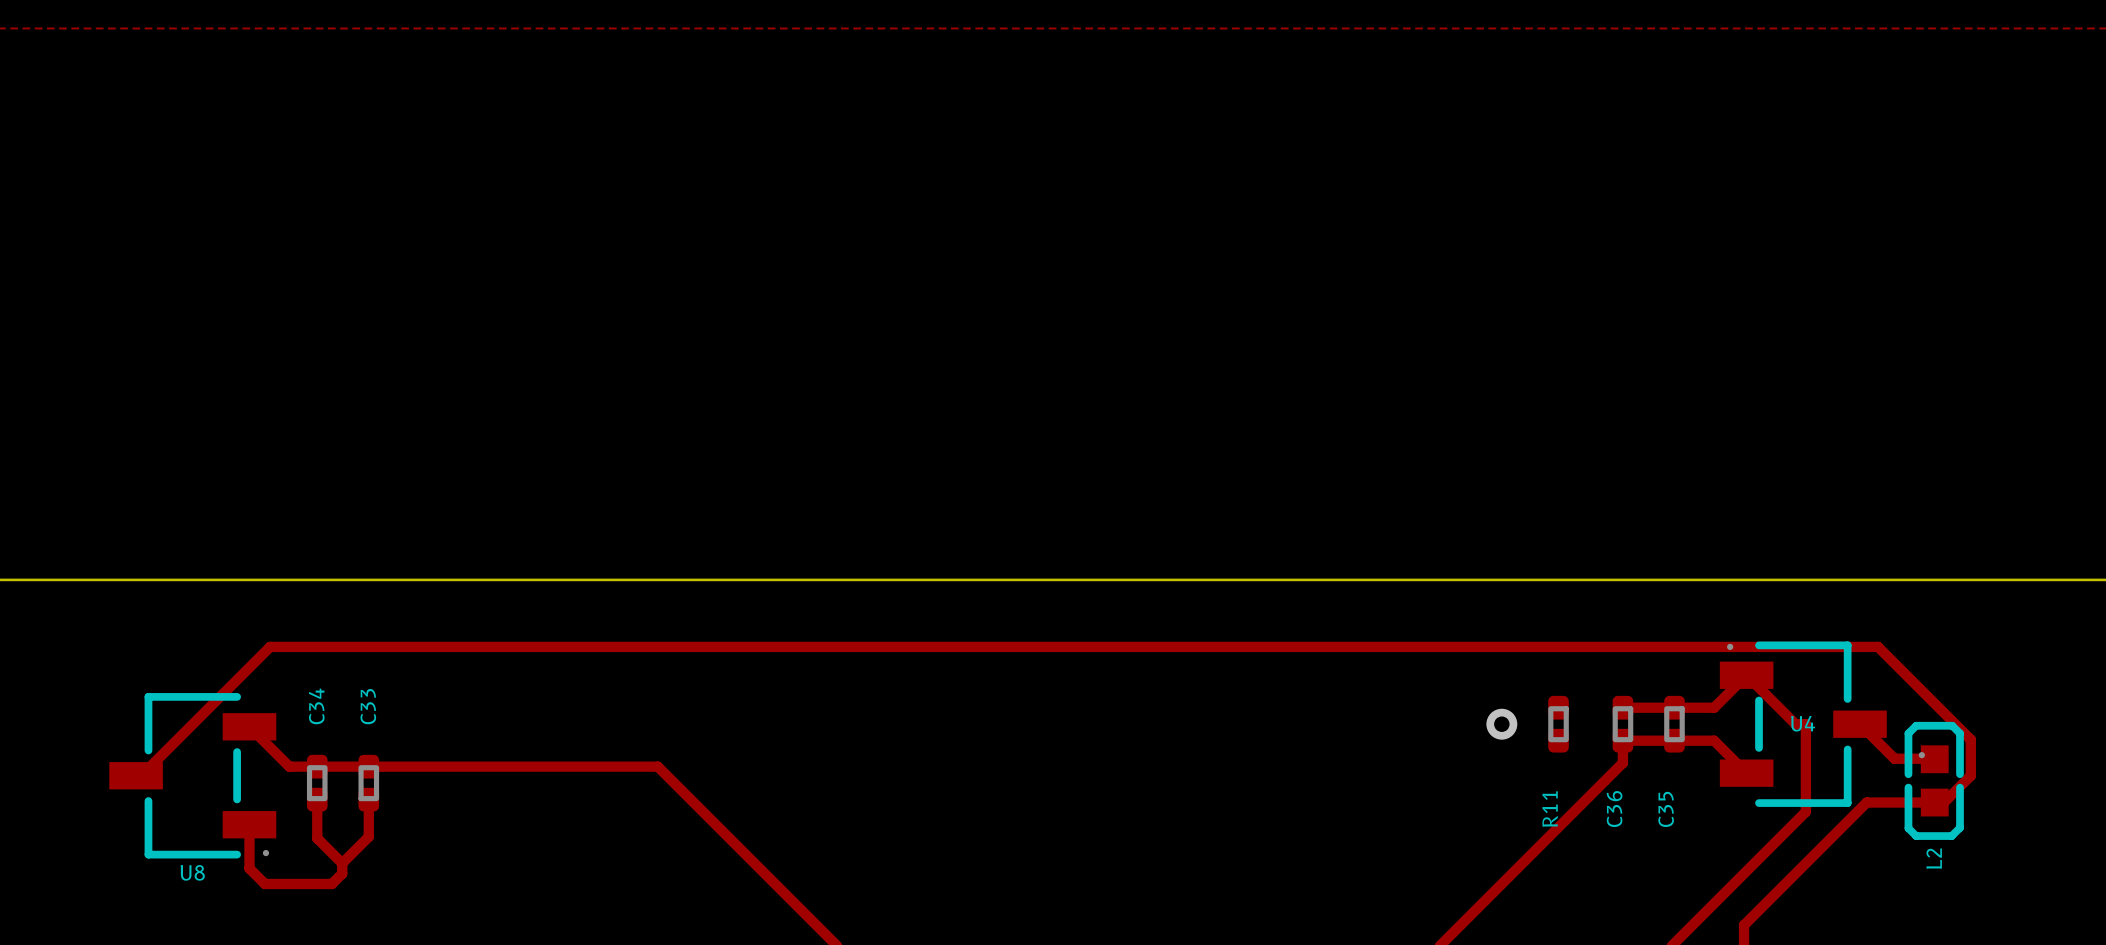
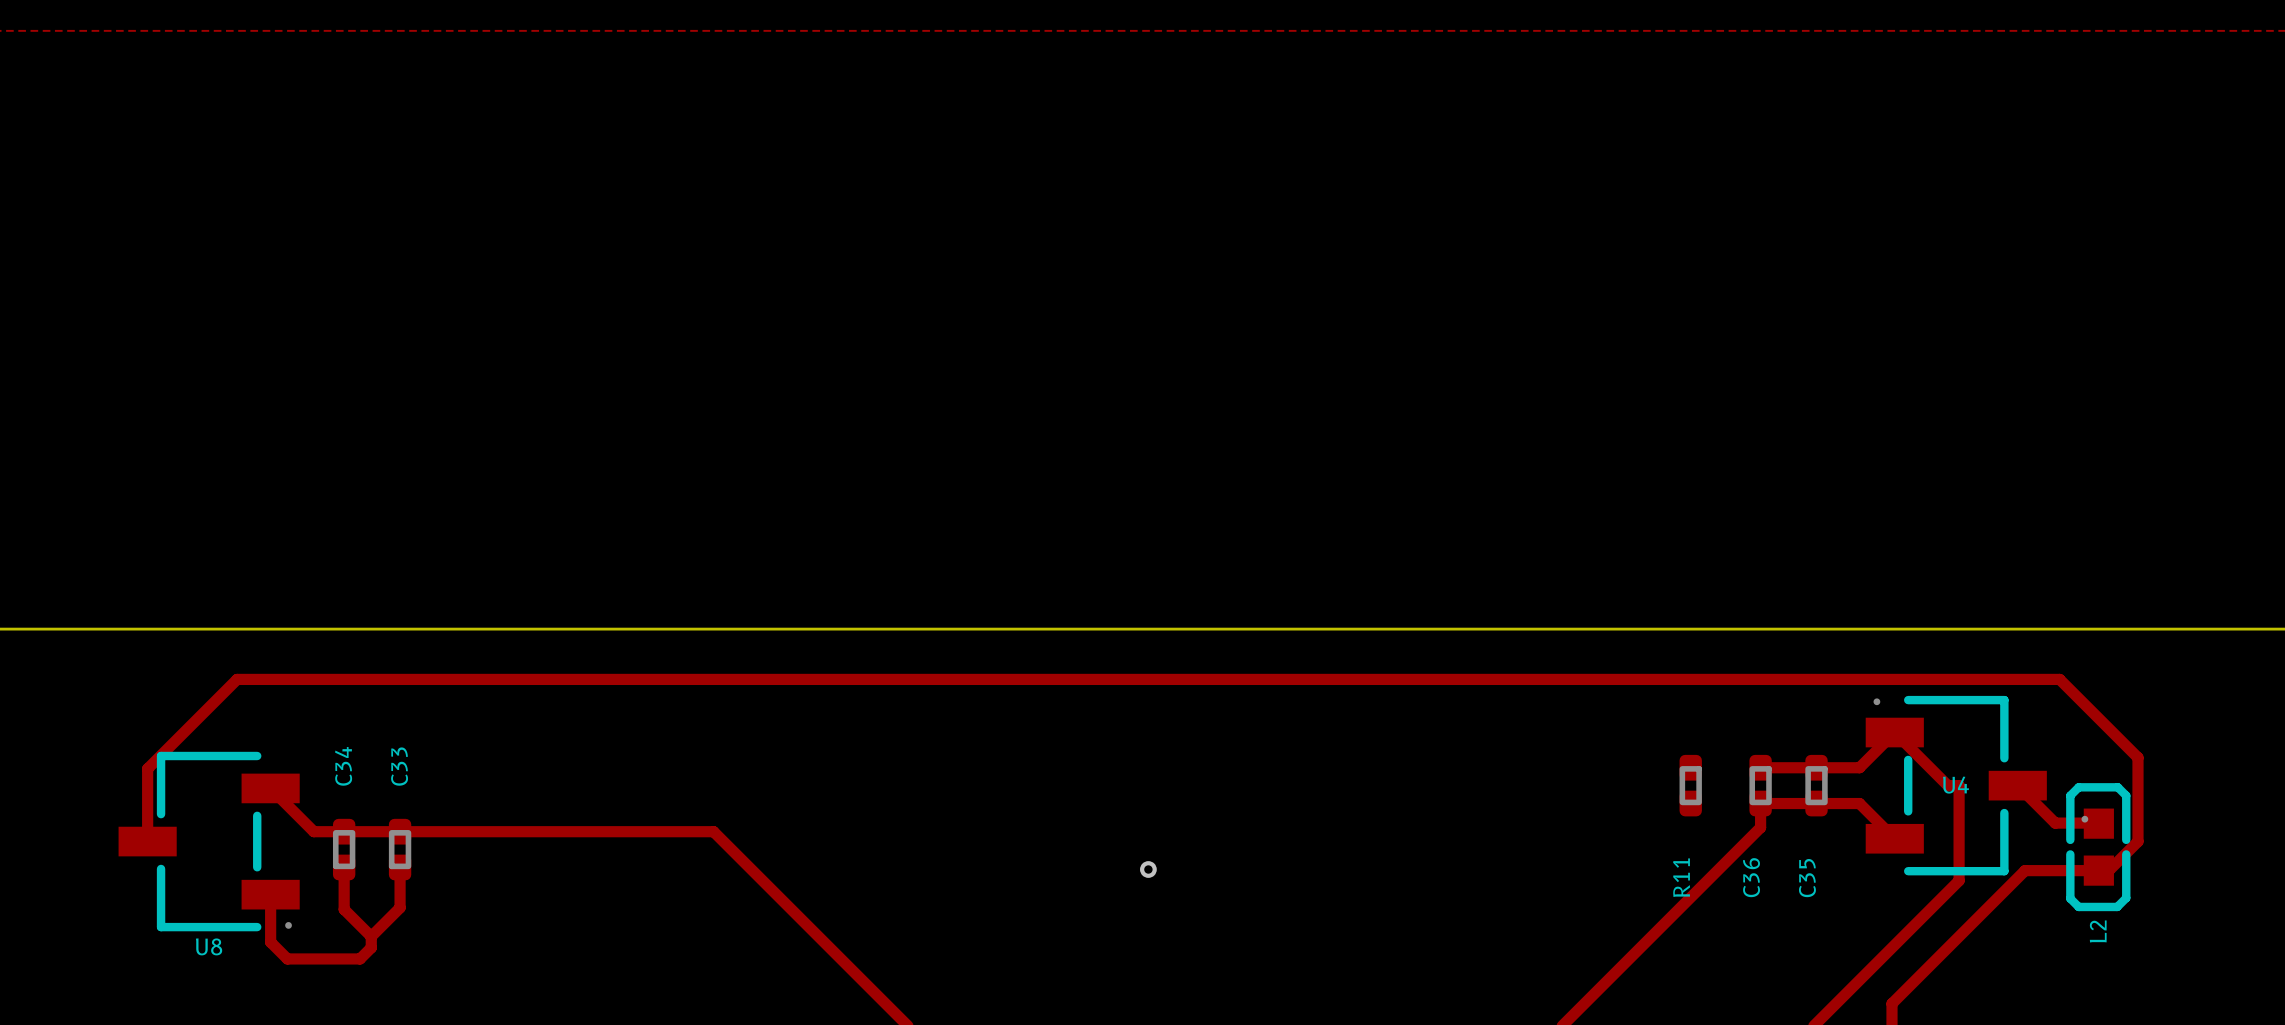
via: (1501, 724) -> none
track: (1970, 739) (1878, 646) (270, 646) (141, 775) (136, 775) -> (2137, 802) (2137, 757) (2059, 679) (237, 679) (147, 768) (147, 841)
via: none -> (1148, 869)

